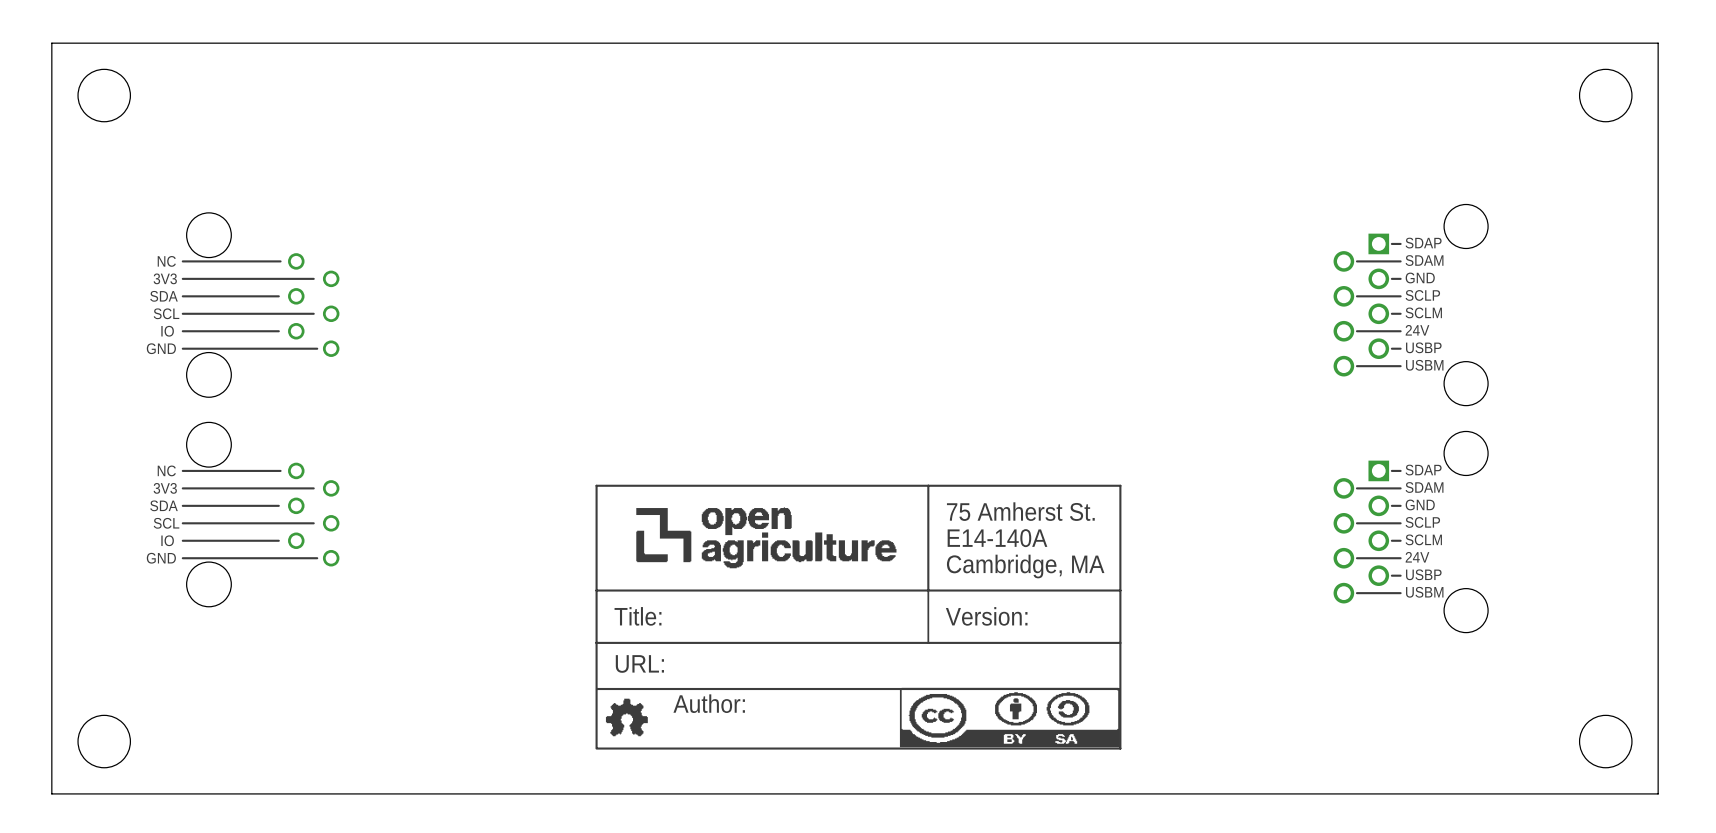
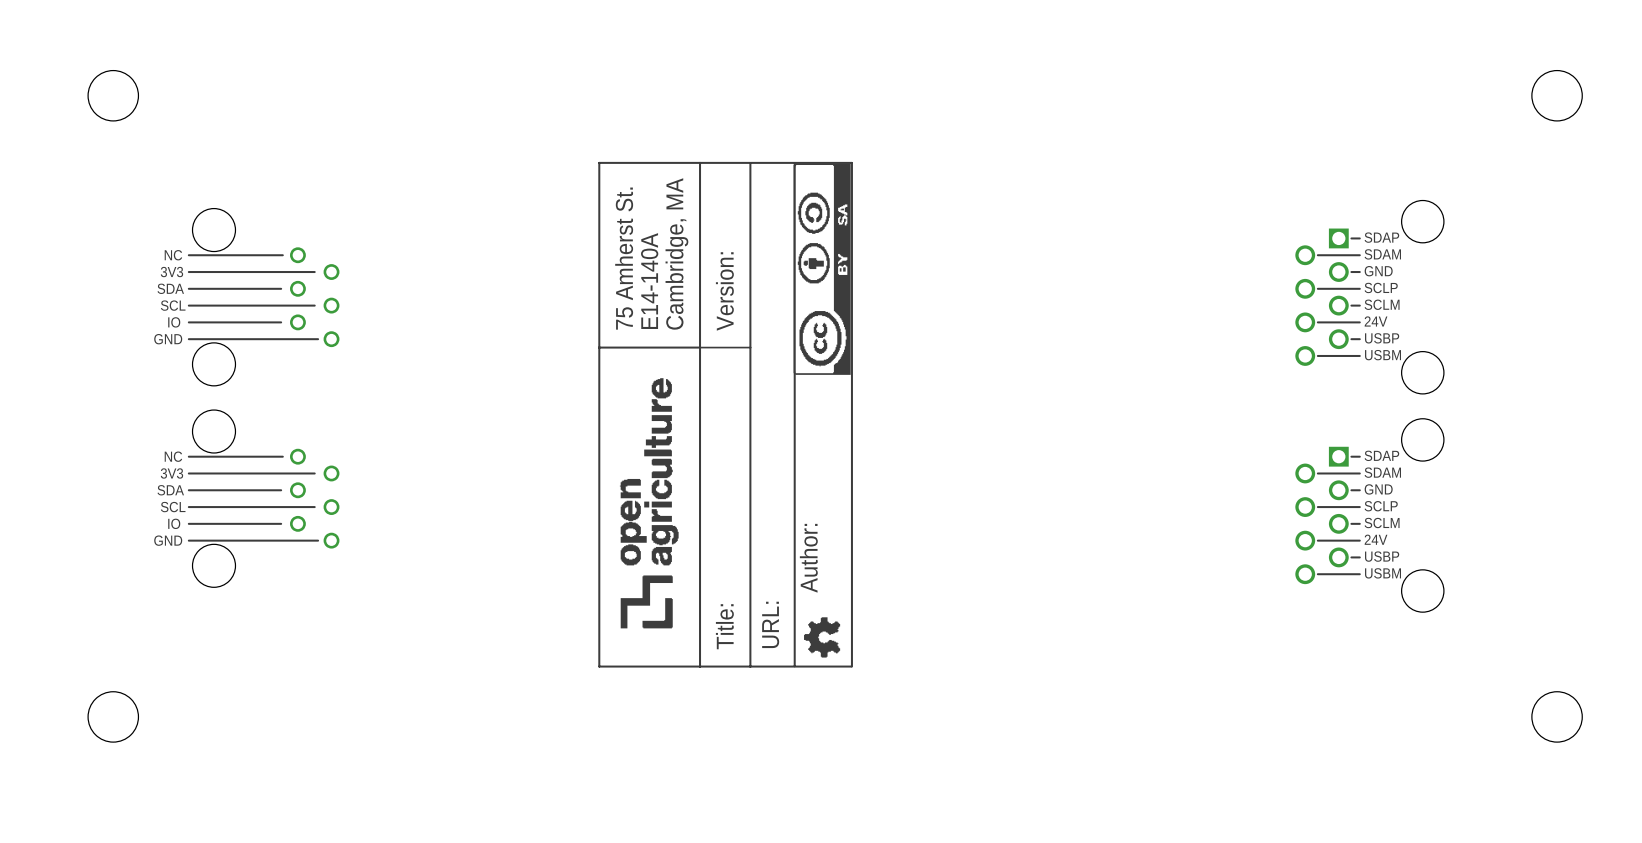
board edge: (1658, 43) (51, 43) (51, 793) (1658, 793) (1658, 43) -> none
drawing: none -> [598, 161, 853, 668]
drawing: [595, 484, 1122, 750] -> none

